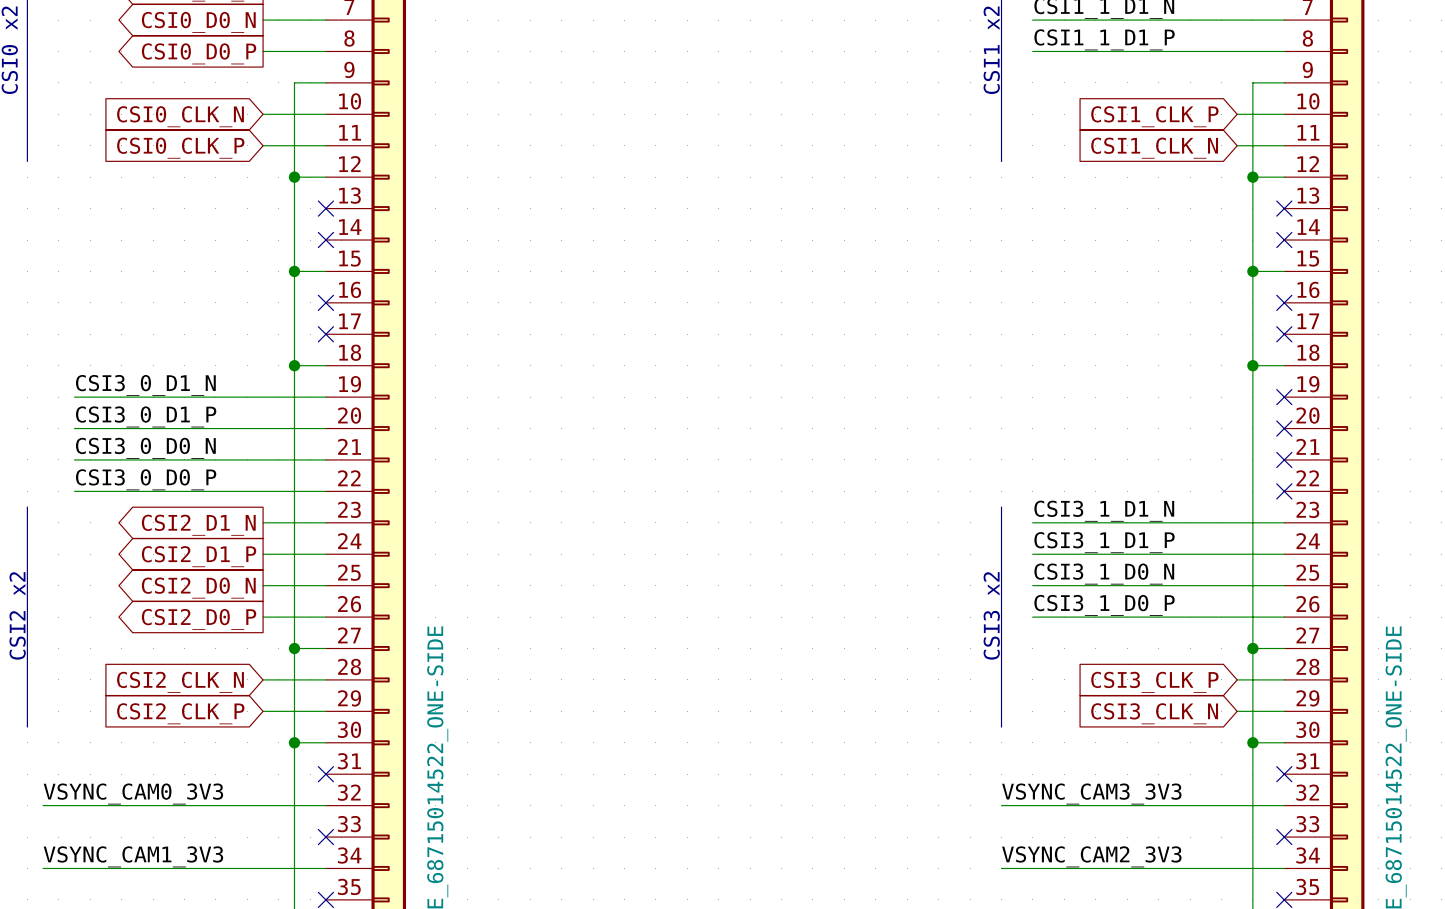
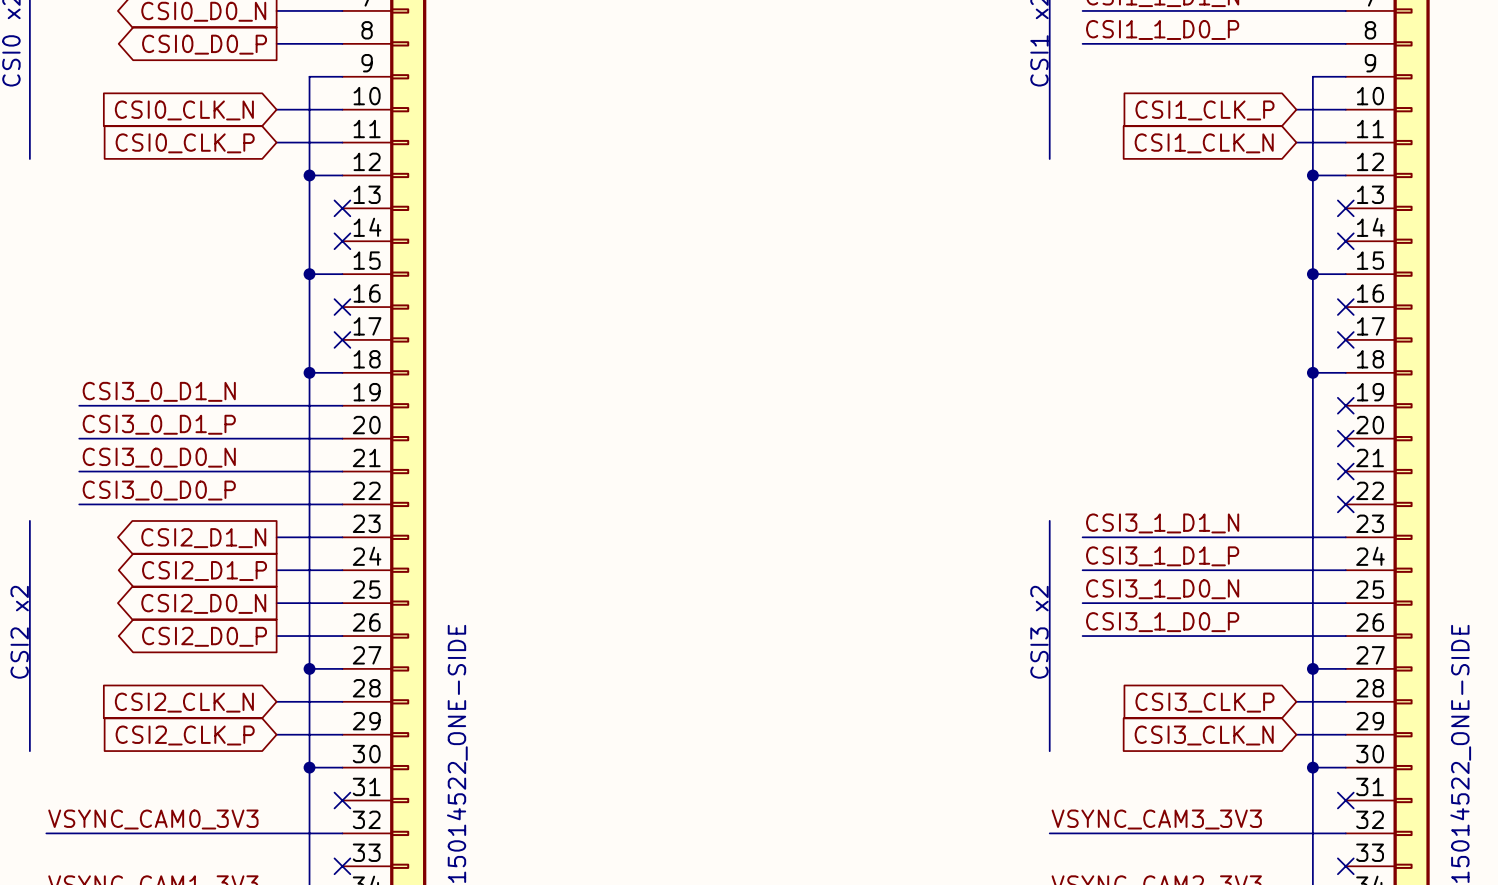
label: CSI1_1_D1_P (1104, 39) -> CSI1_1_D0_P (1162, 29)

